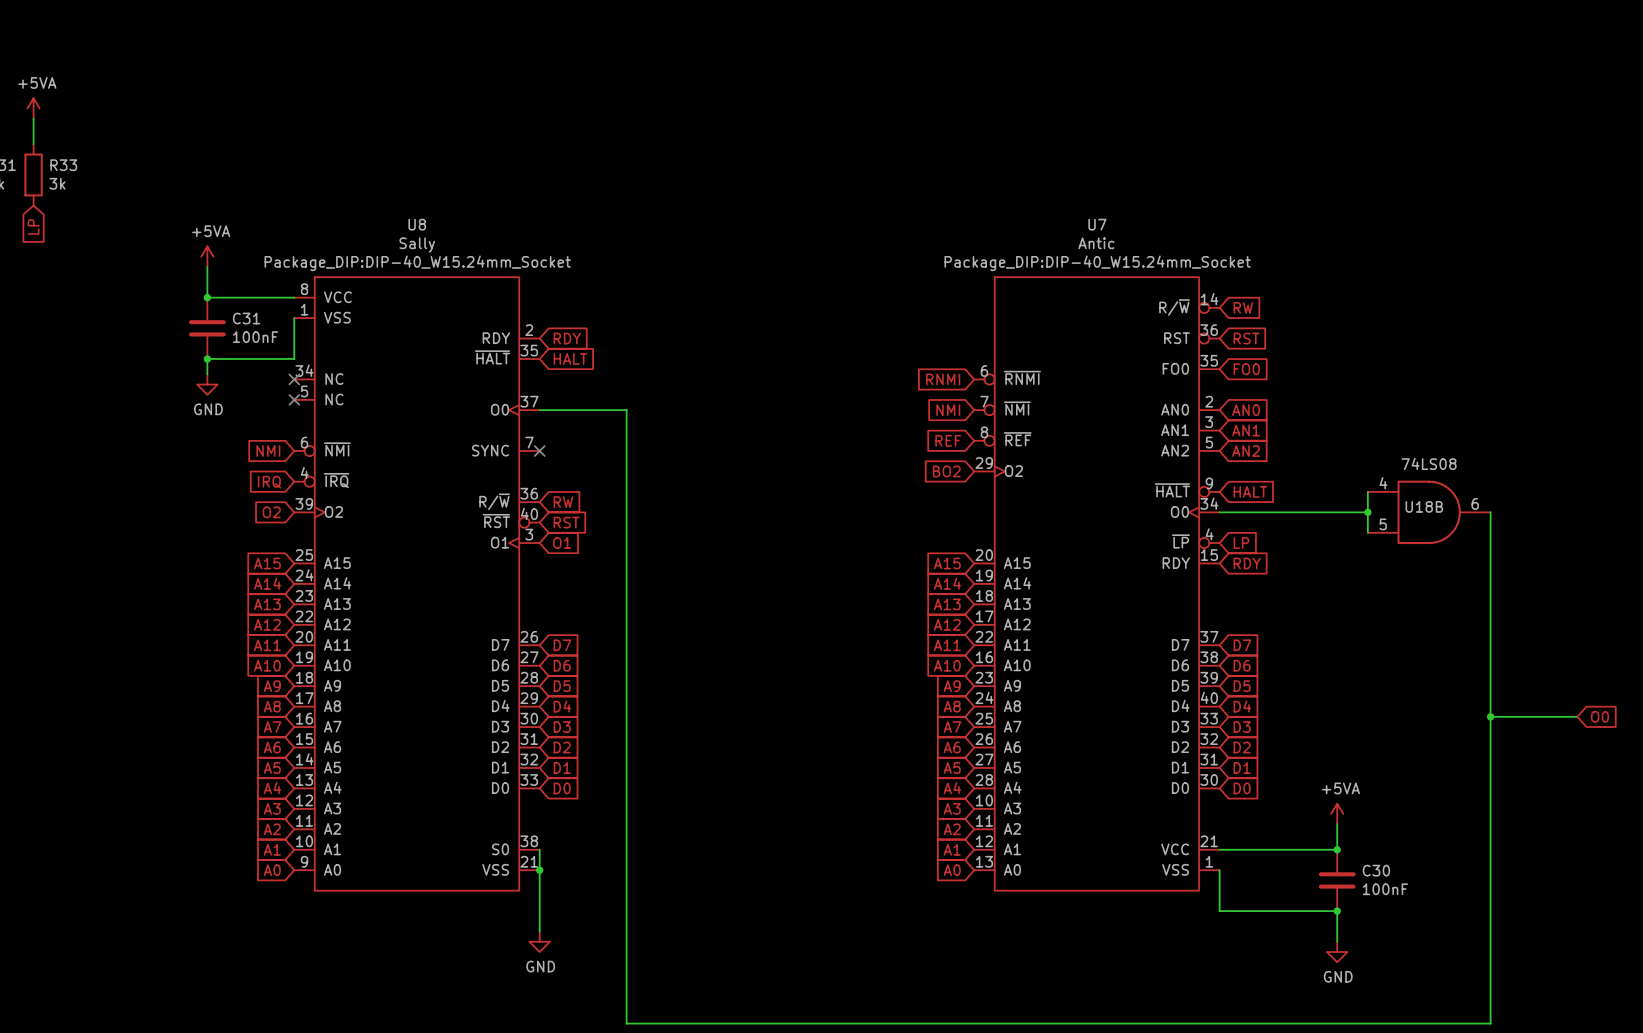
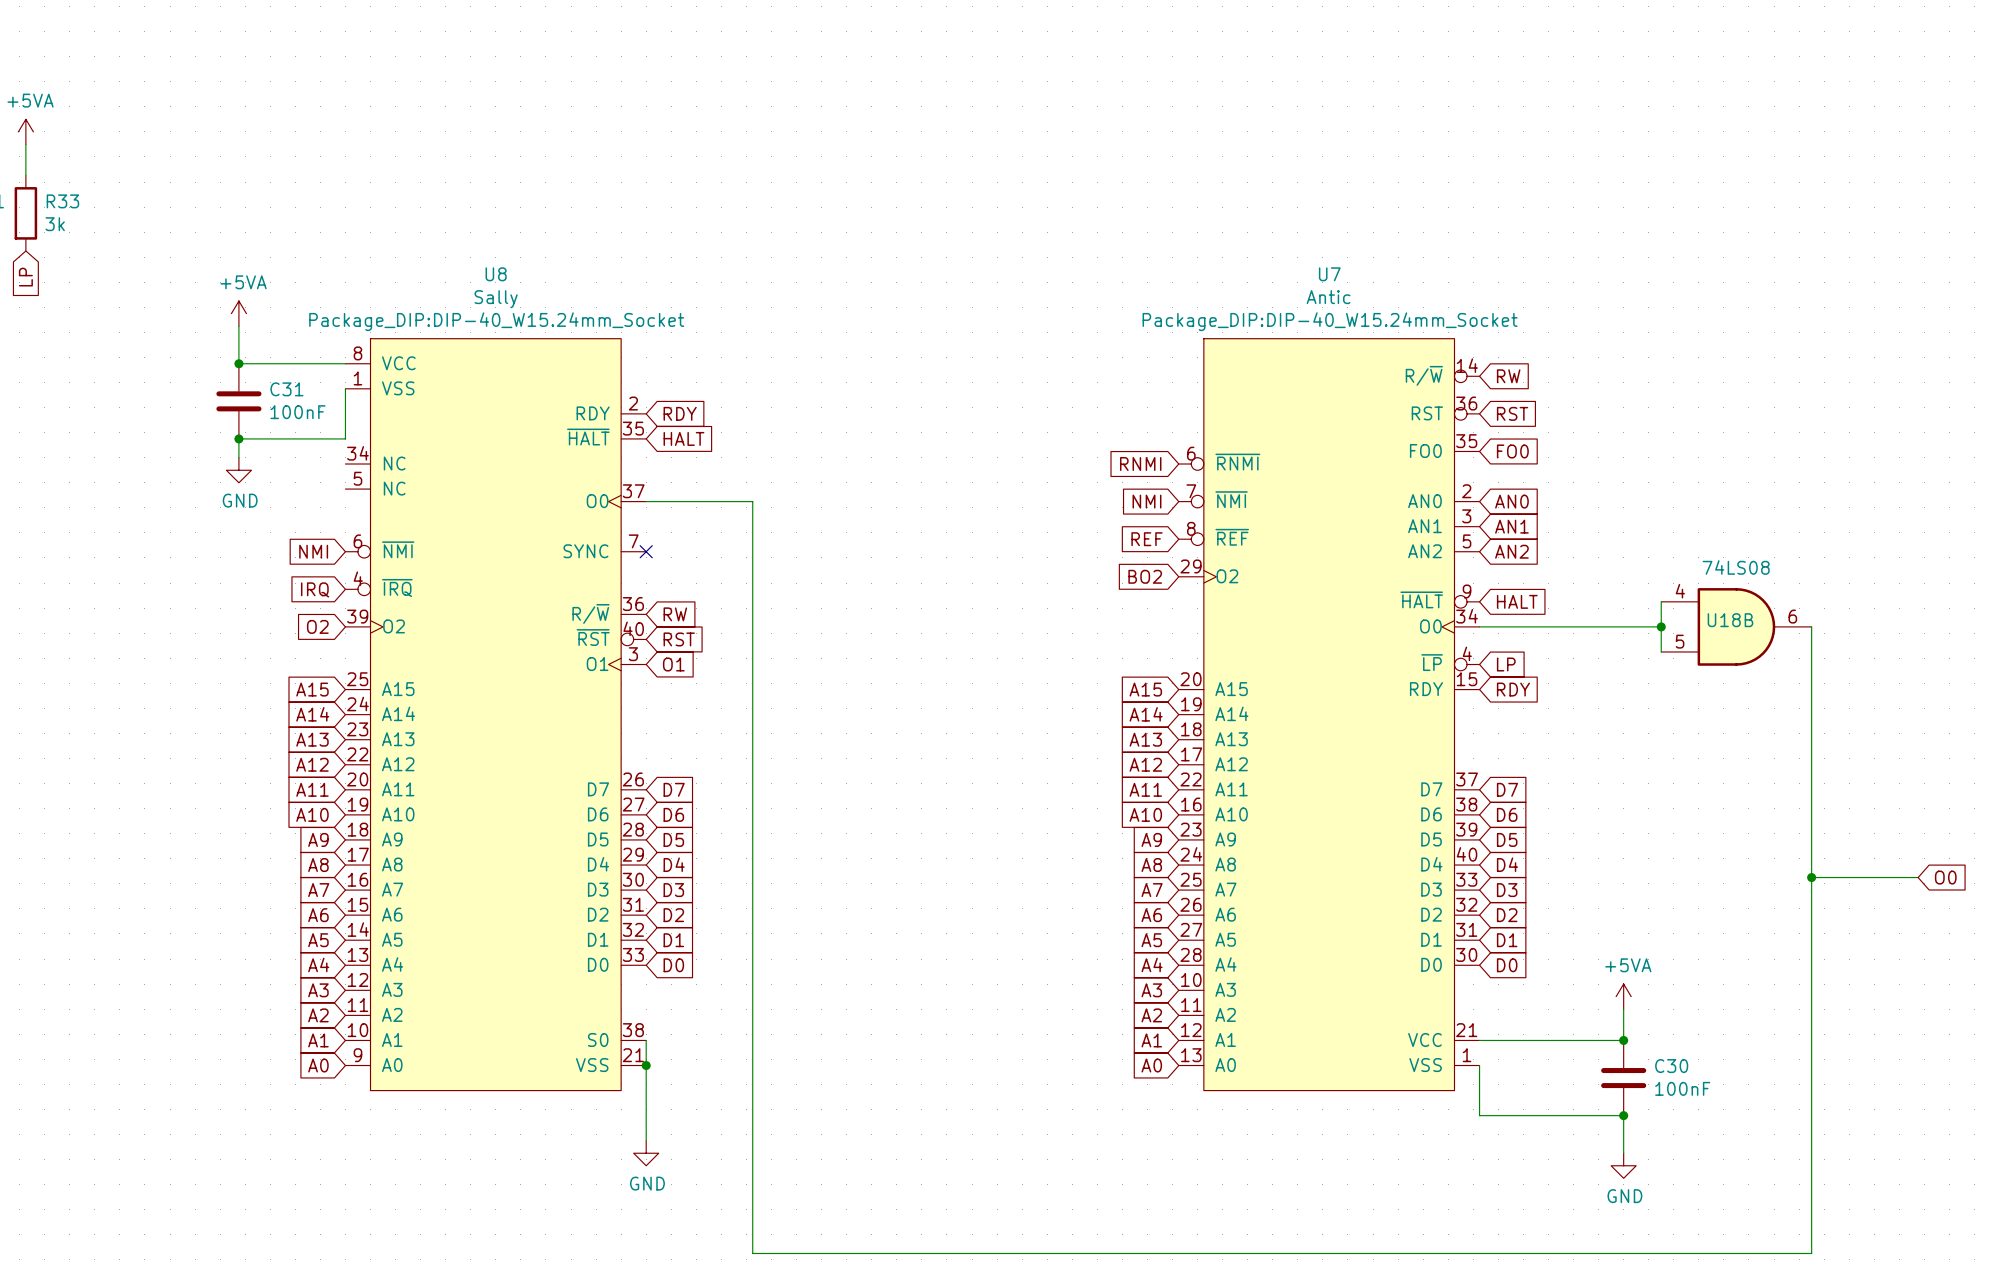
no-connect mark: (294, 379) -> none
no-connect mark: (294, 399) -> none

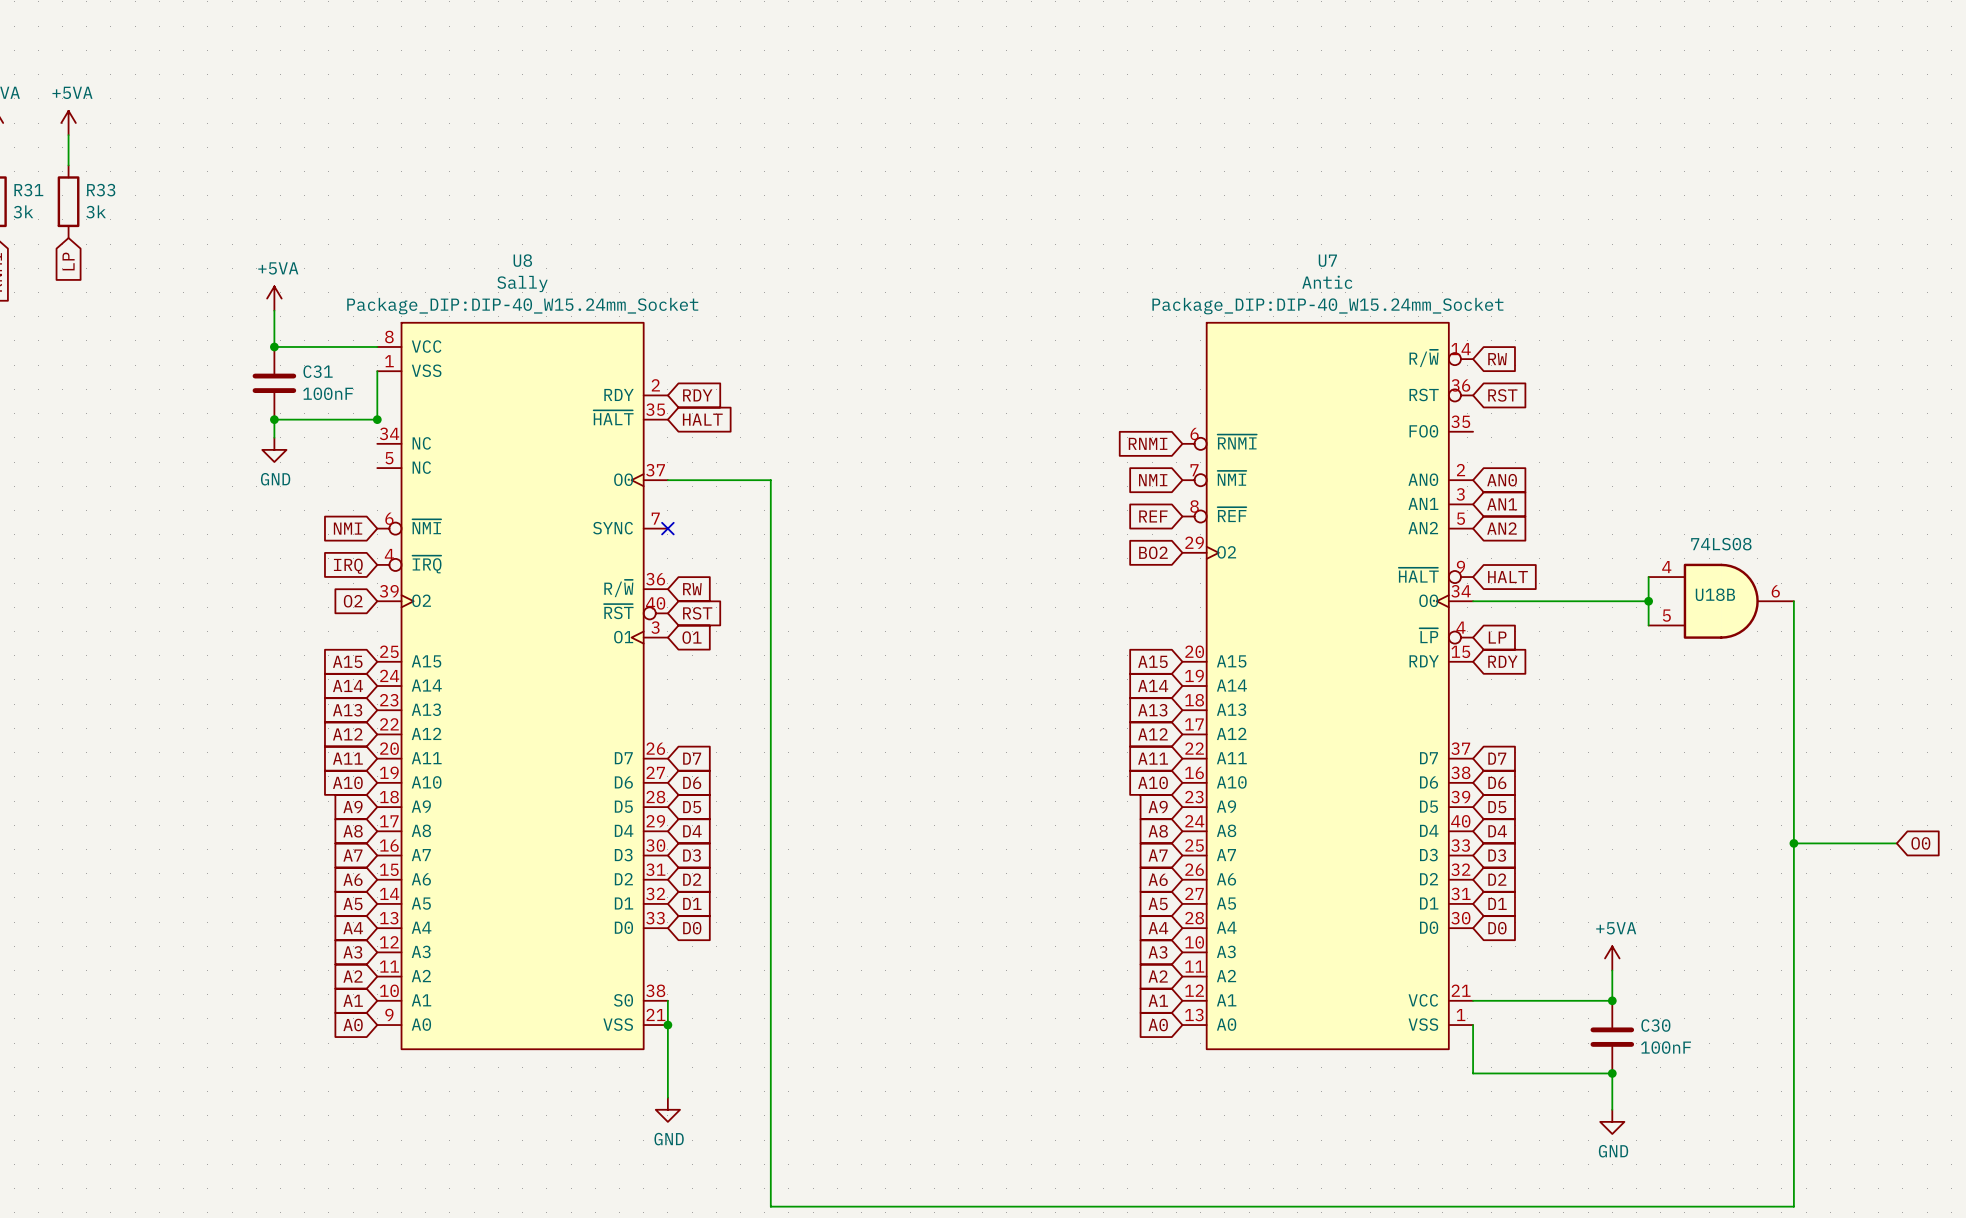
junction: none -> (377, 419)
global label: FO0 (1512, 451) -> none

